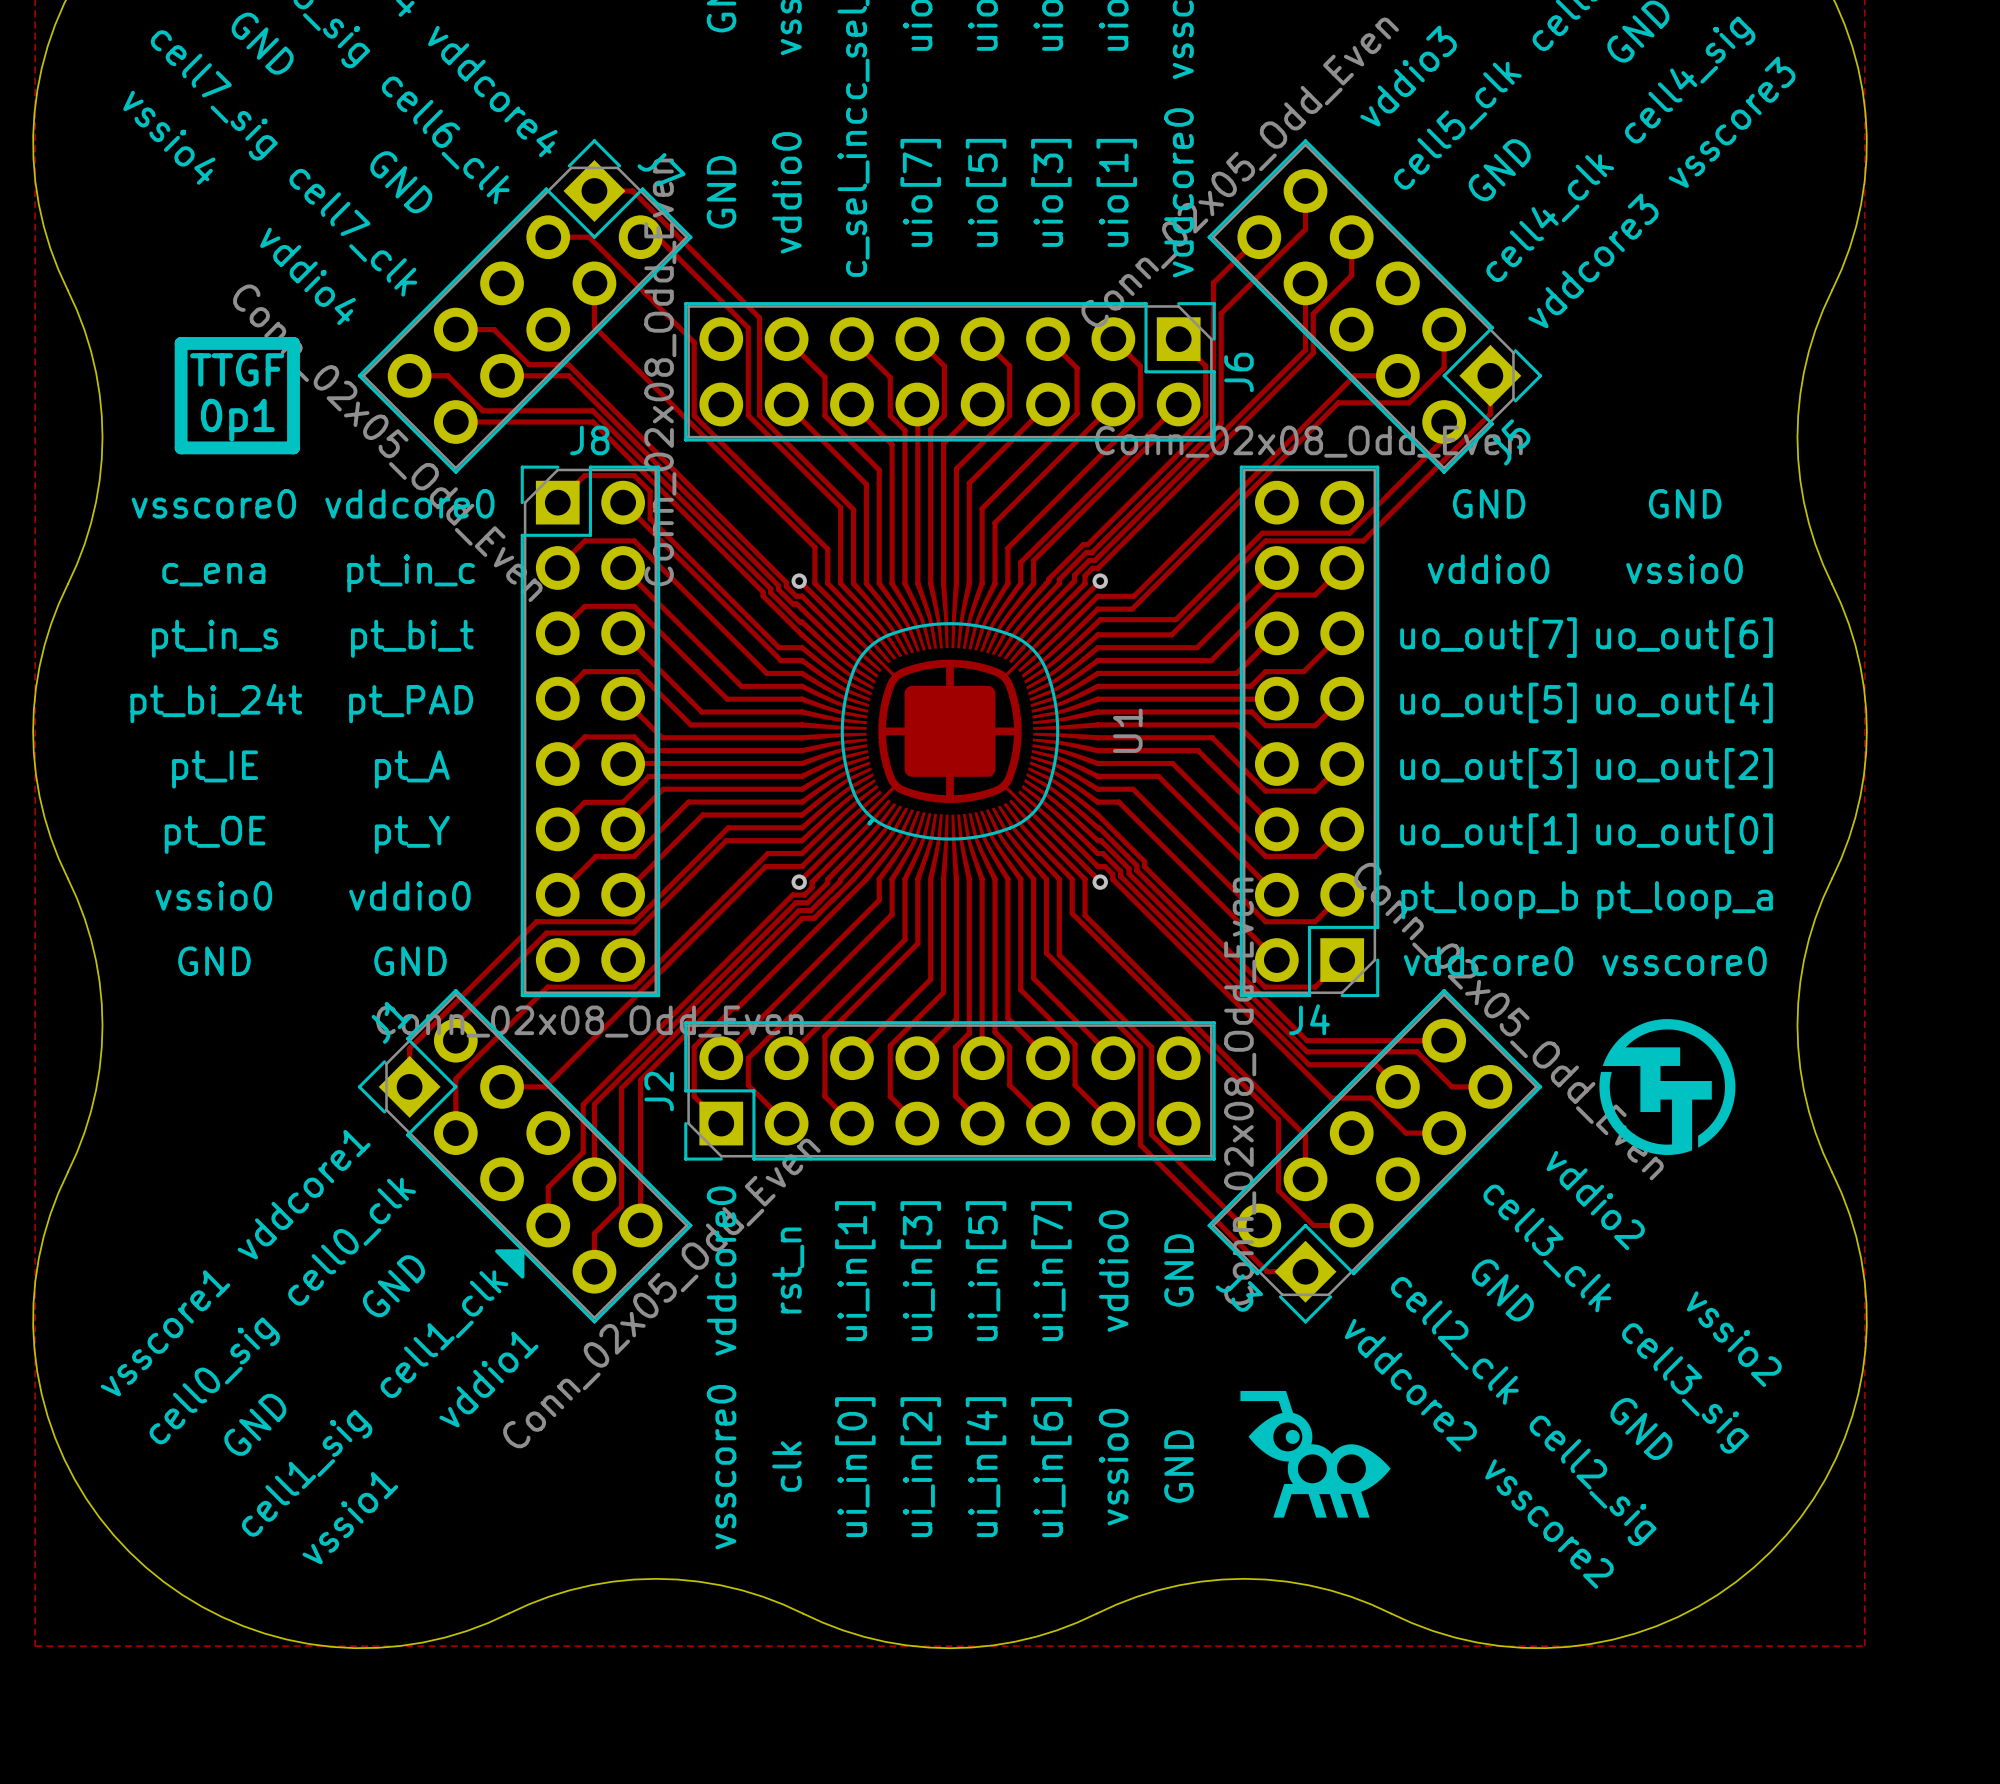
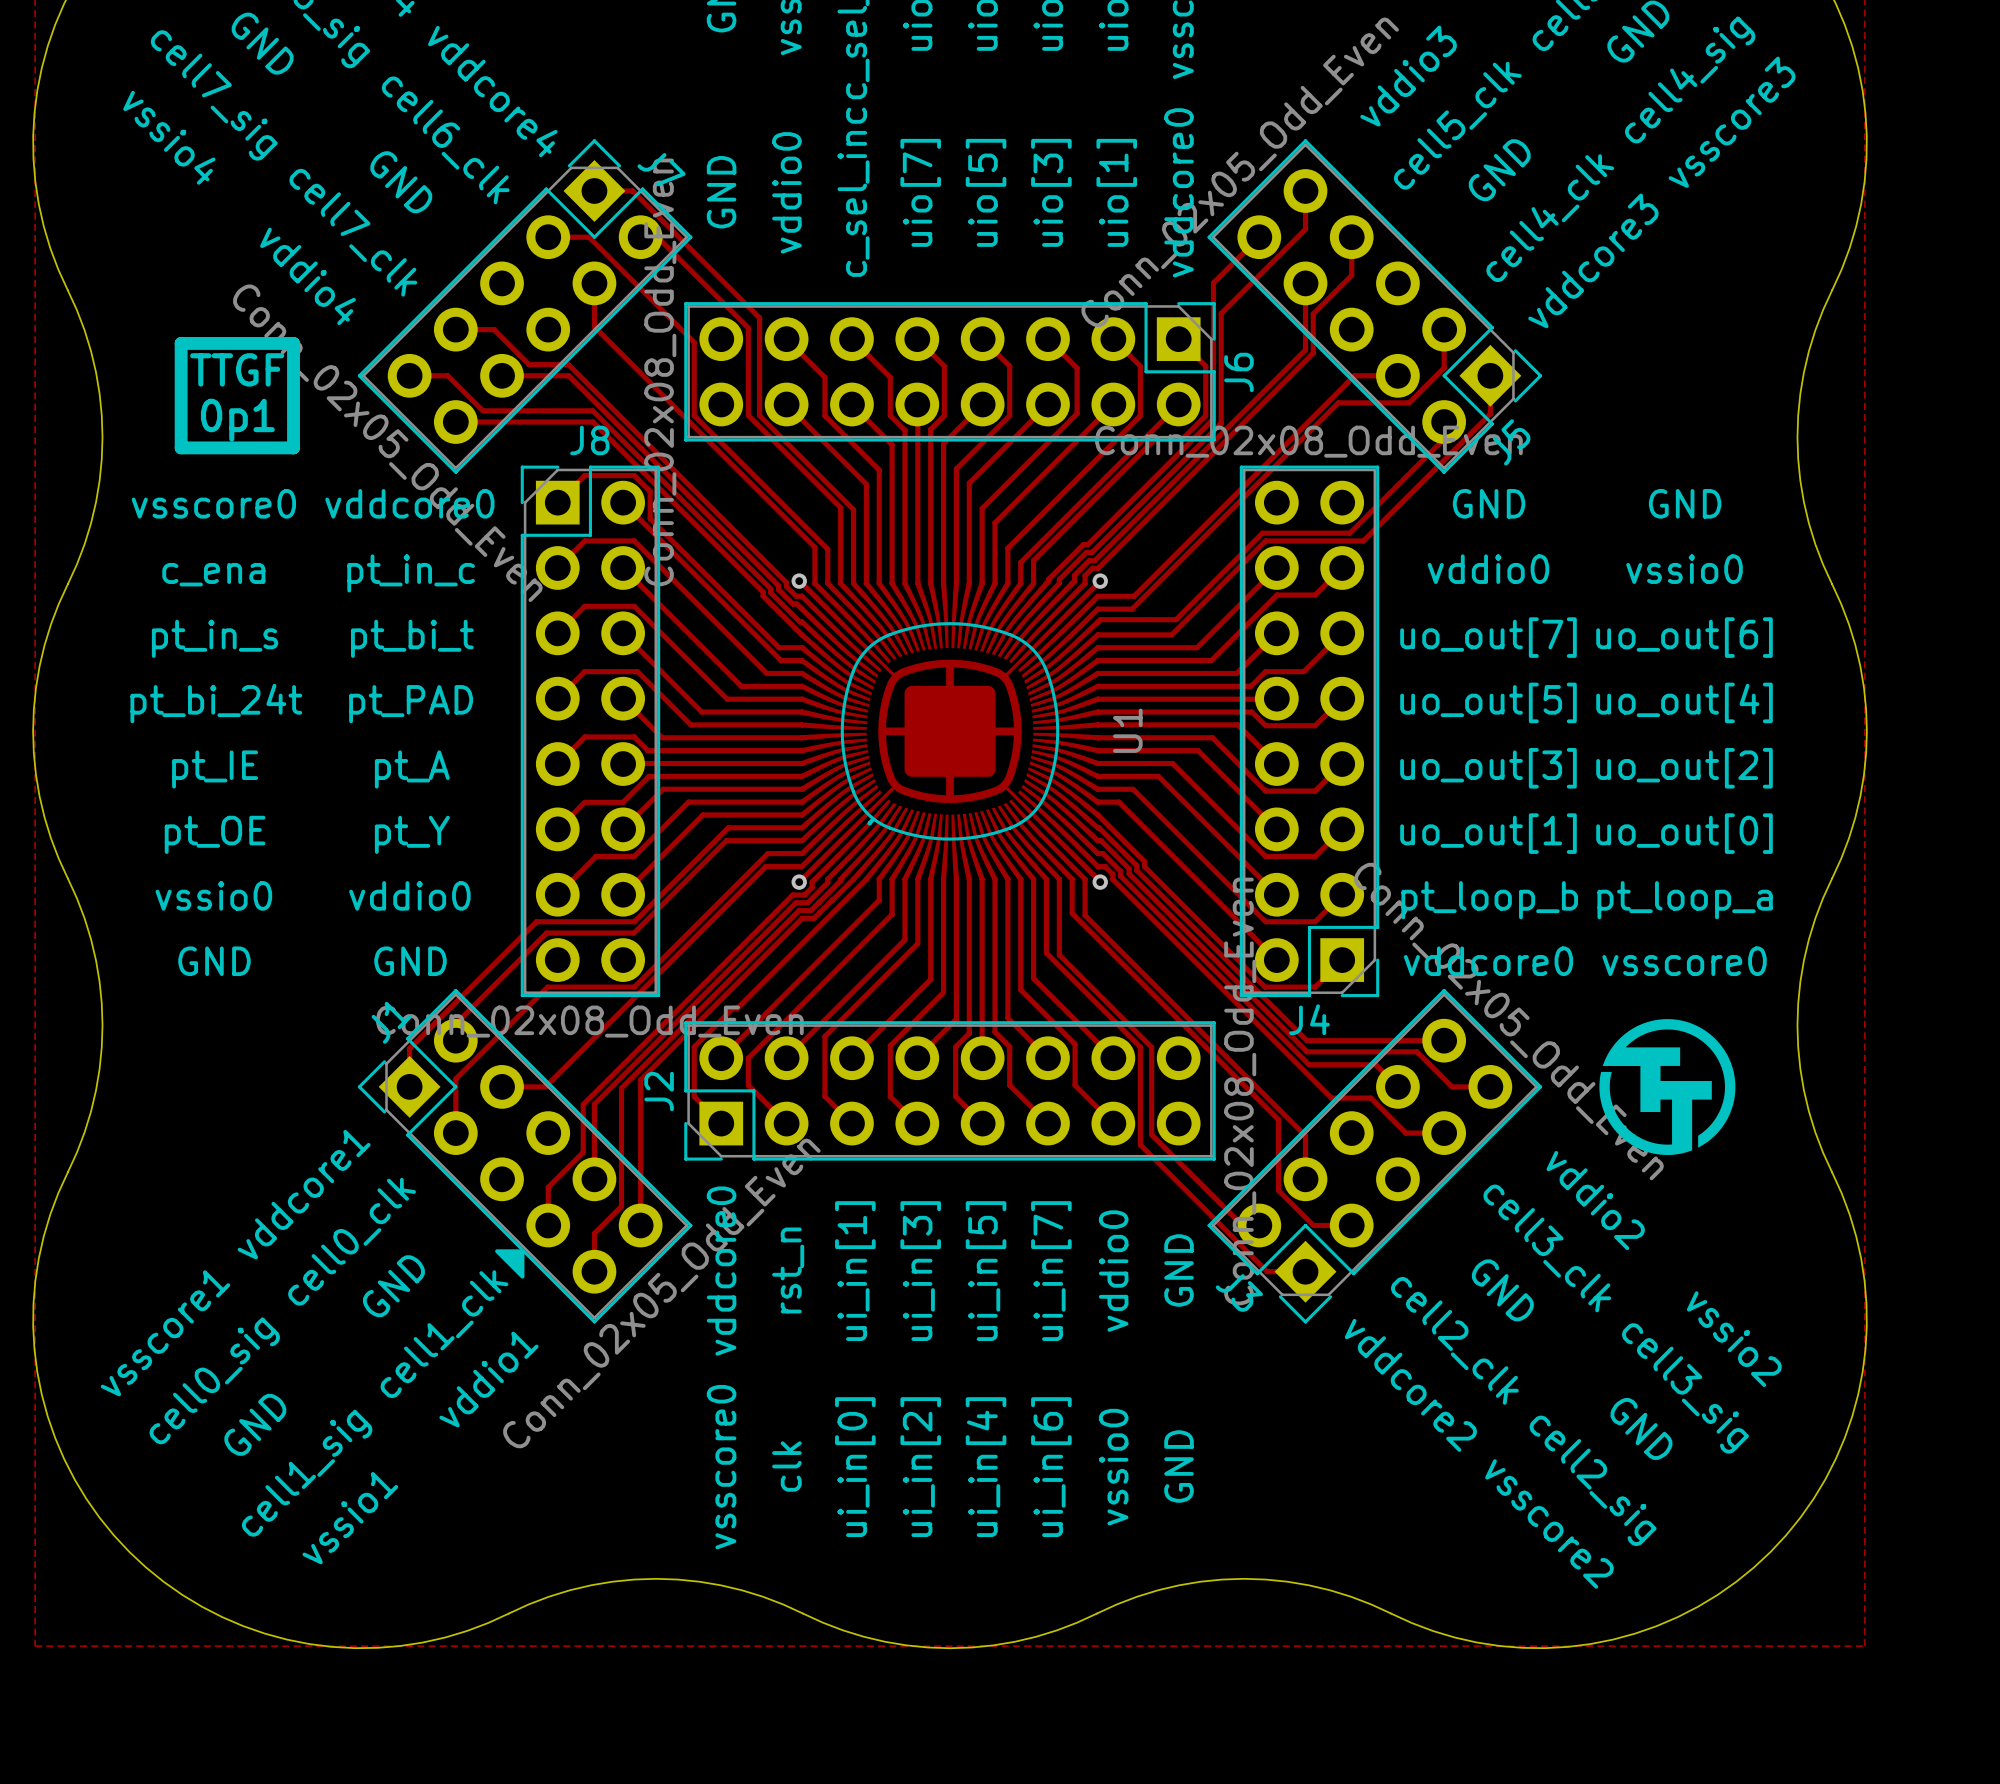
drawing: [1240, 1390, 1391, 1518] -> none

